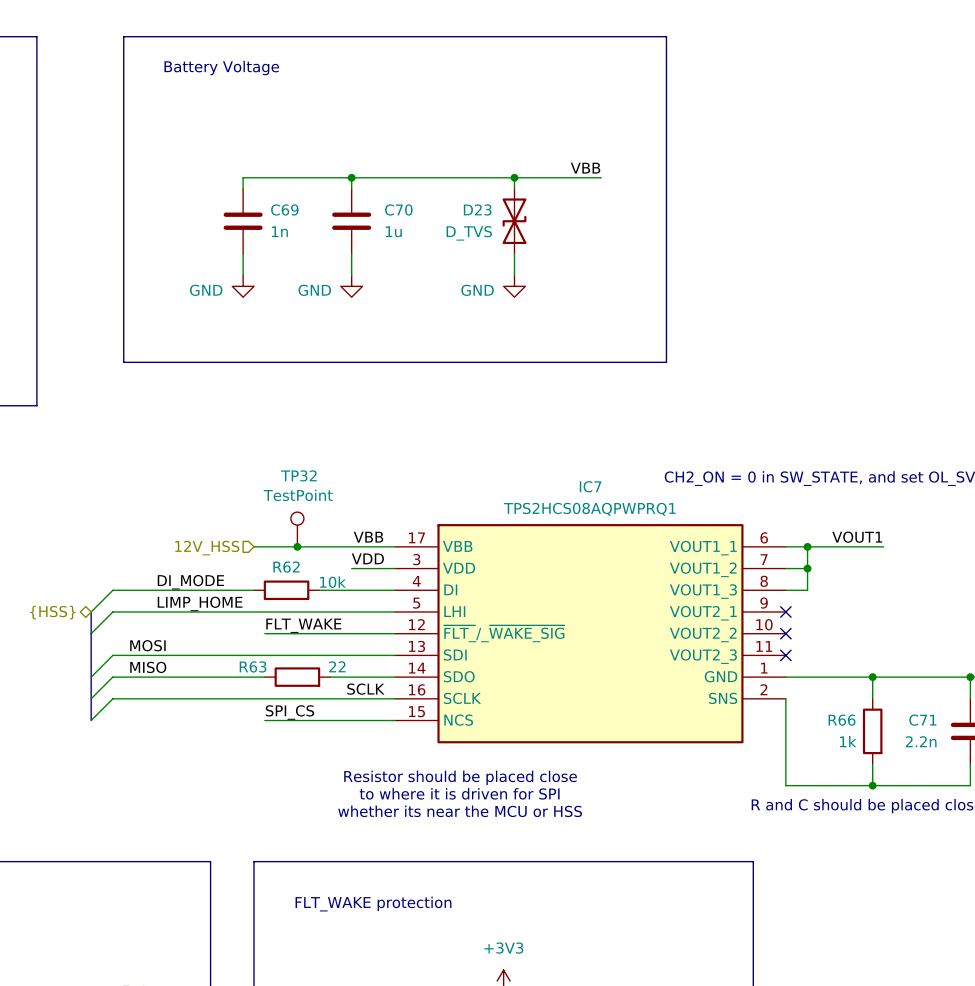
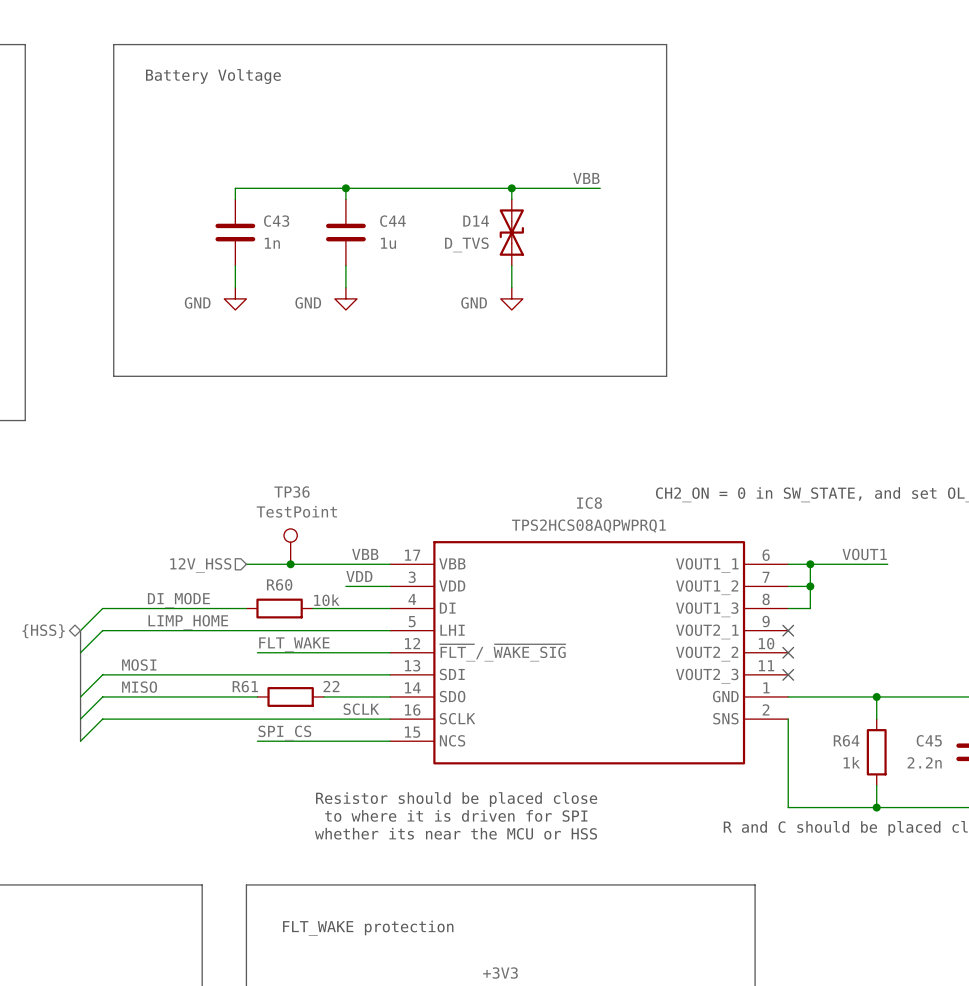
C69 name: C69 (284, 209) -> C43 (276, 221)
C70 name: C70 (398, 209) -> C44 (392, 221)
D23 name: D23 (477, 209) -> D14 (476, 221)
TP32 name: TP32 (298, 475) -> TP36 (292, 492)
IC7 name: IC7 (590, 486) -> IC8 (589, 503)
R62 name: R62 (286, 567) -> R60 (279, 584)
R63 name: R63 (253, 666) -> R61 (245, 686)
R66 name: R66 (842, 720) -> R64 (846, 740)
C71 name: C71 (922, 720) -> C45 (929, 740)

